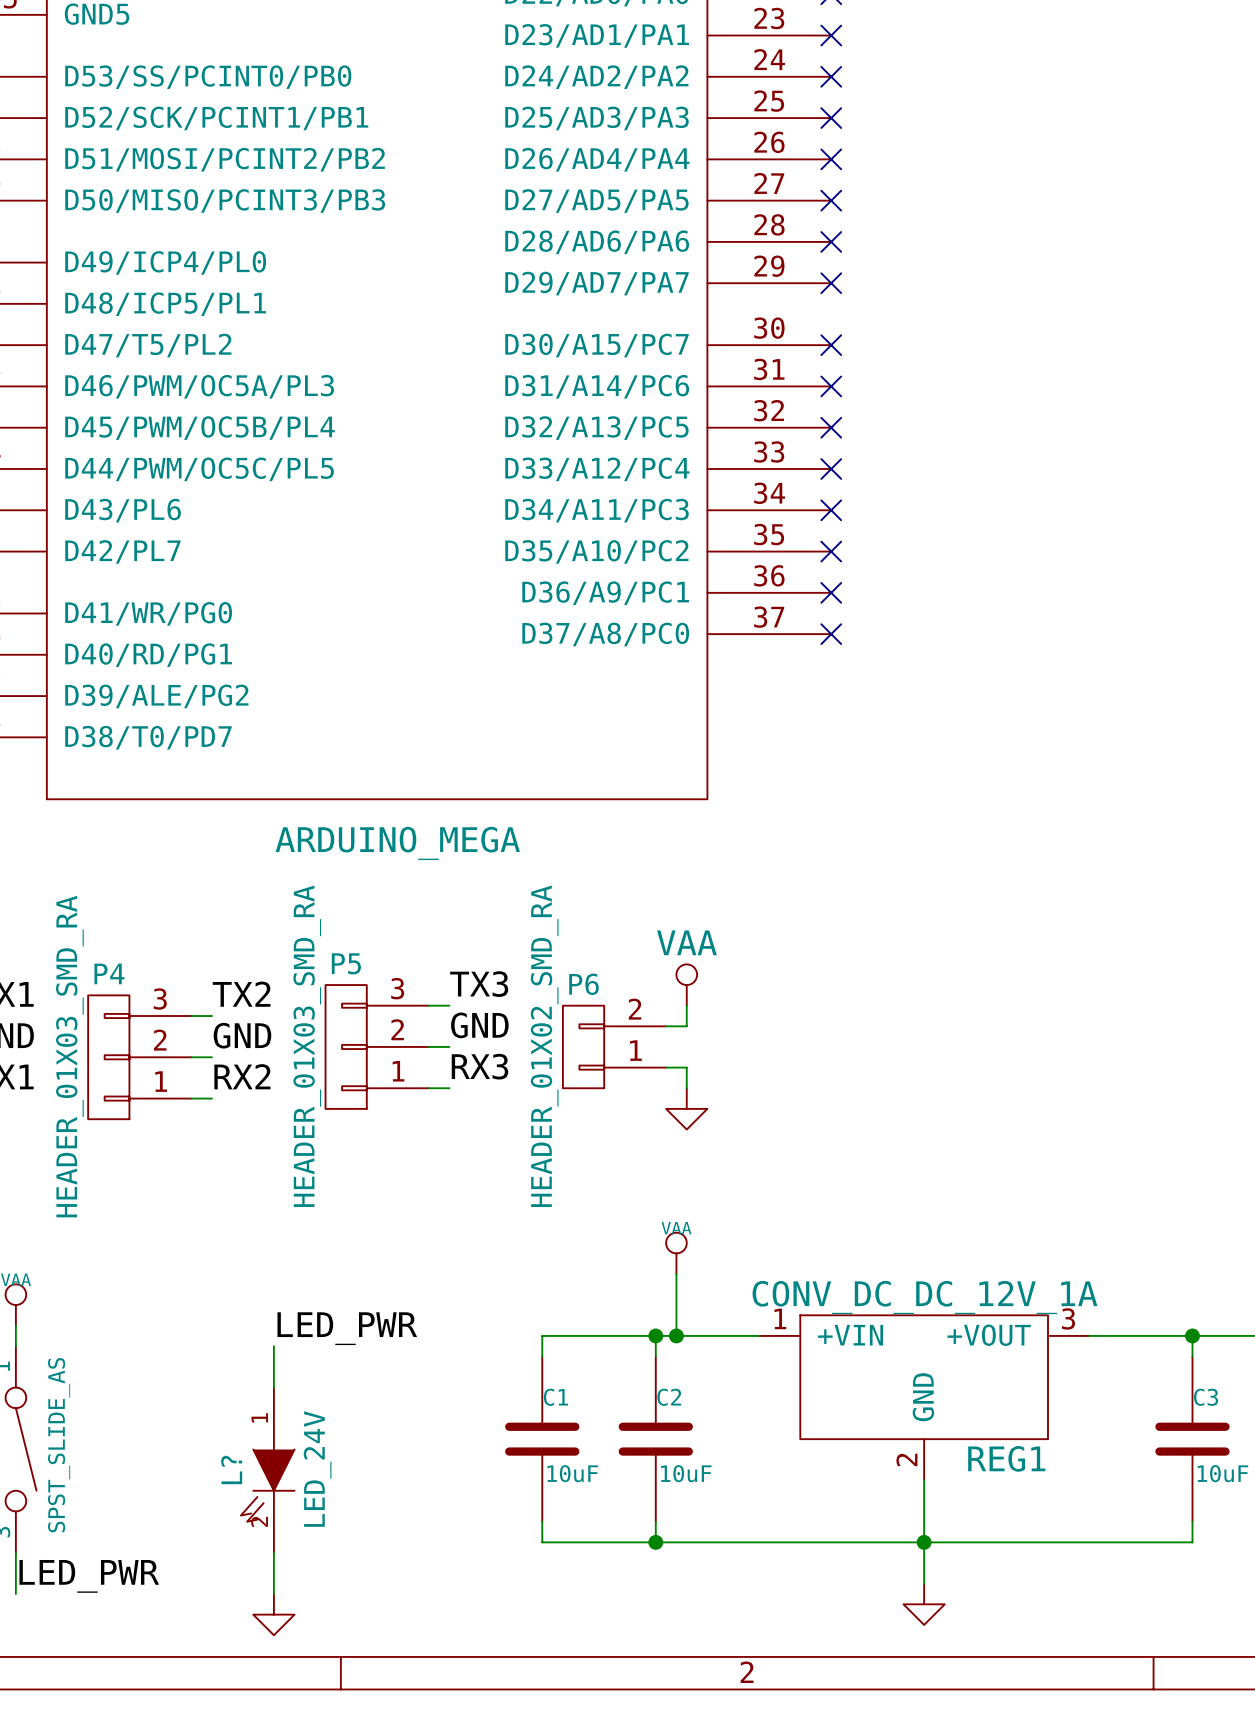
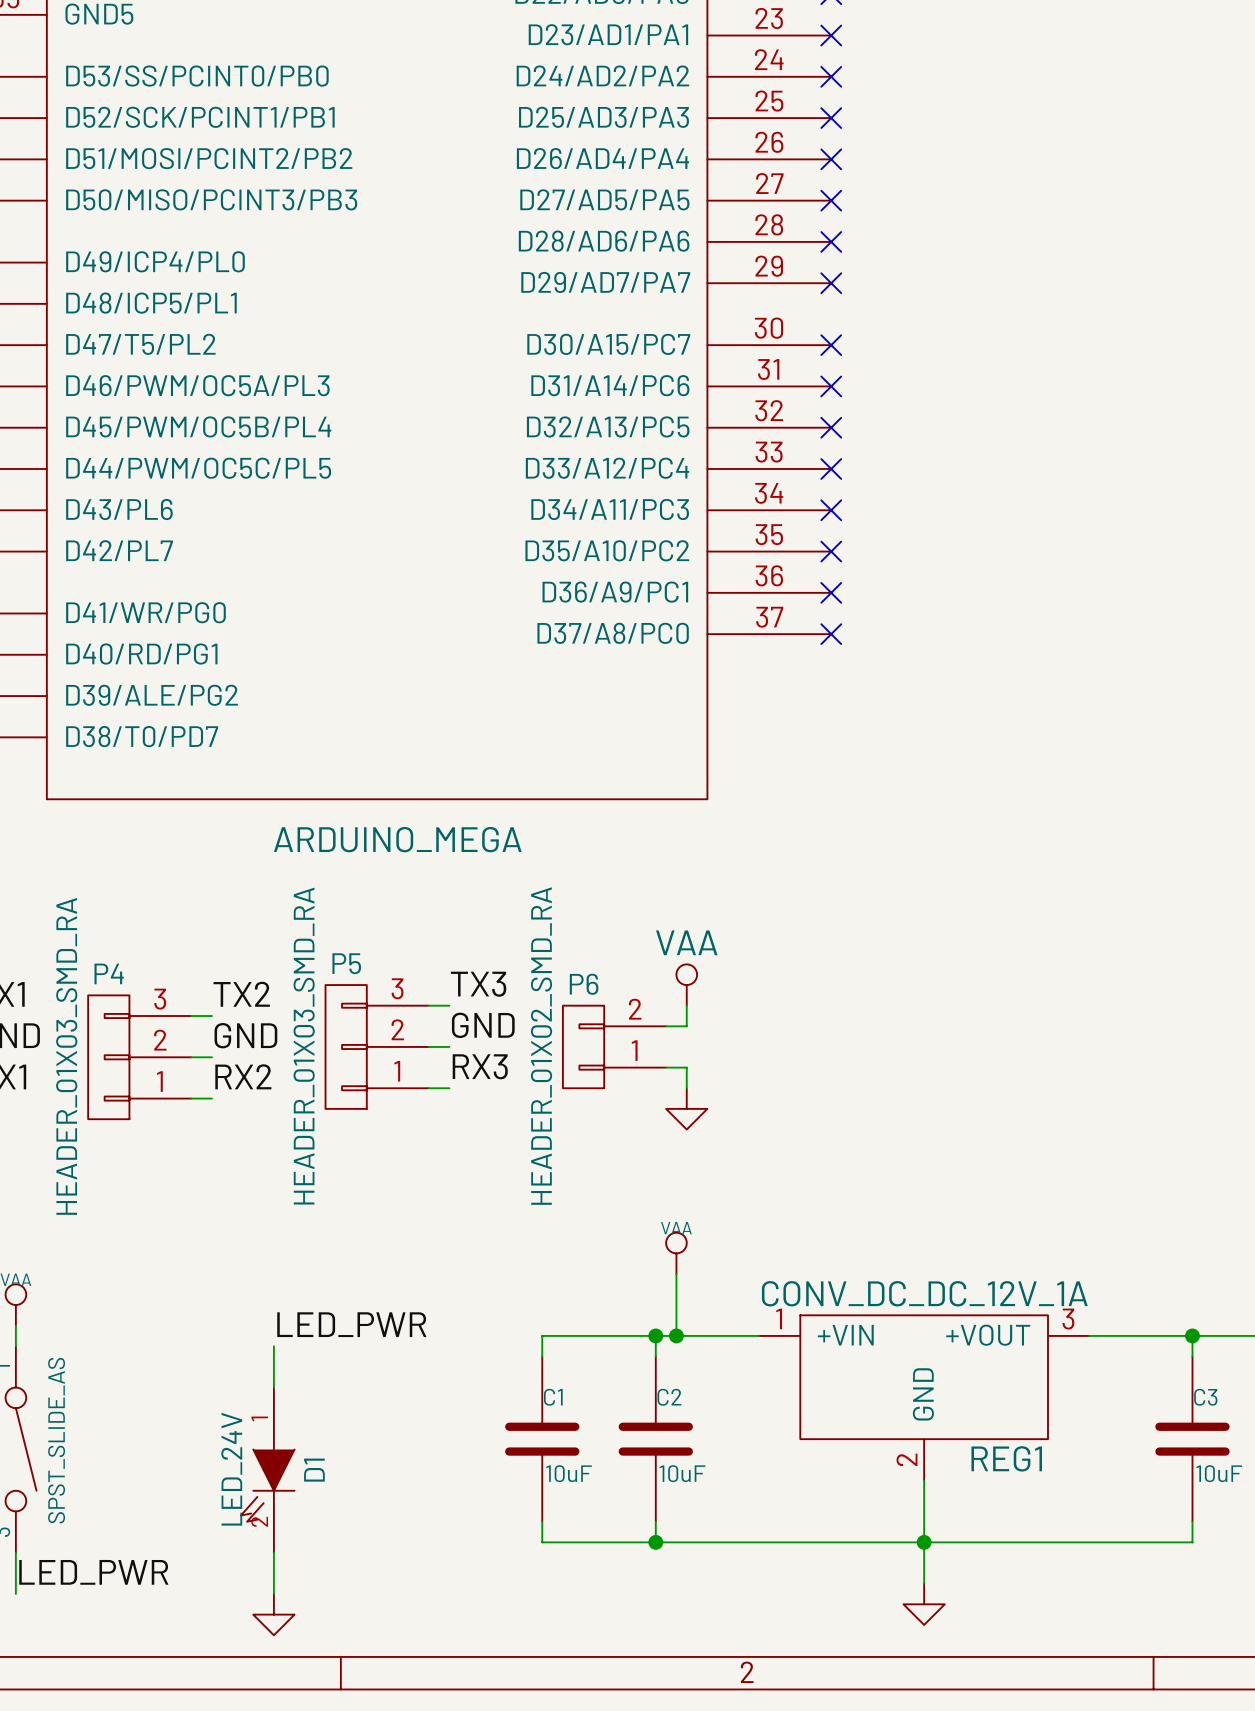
L? name: L? (231, 1469) -> D1 (314, 1470)
L? value position: LED_24V (317, 1469) -> LED_24V (231, 1469)

